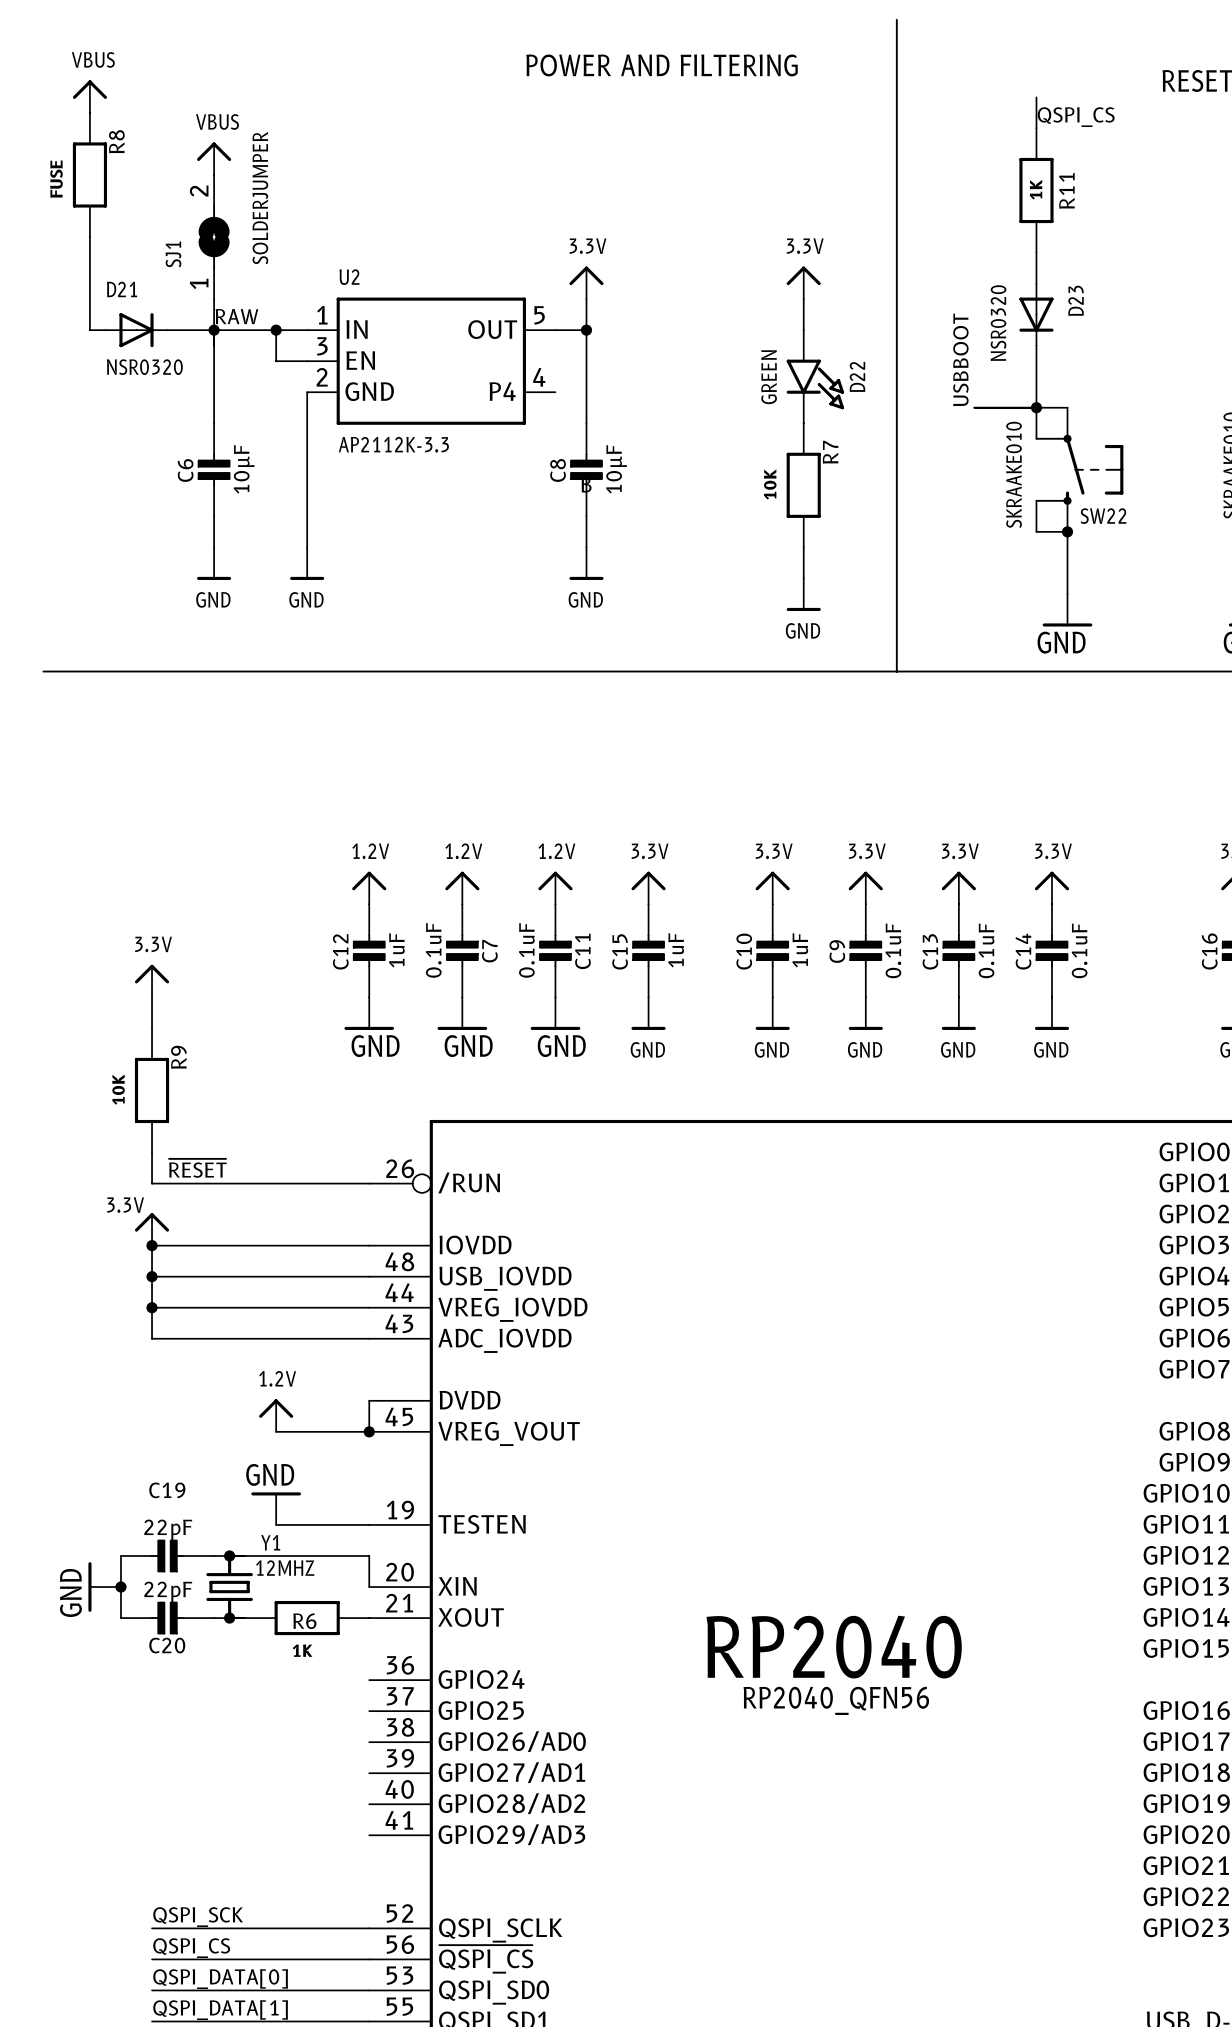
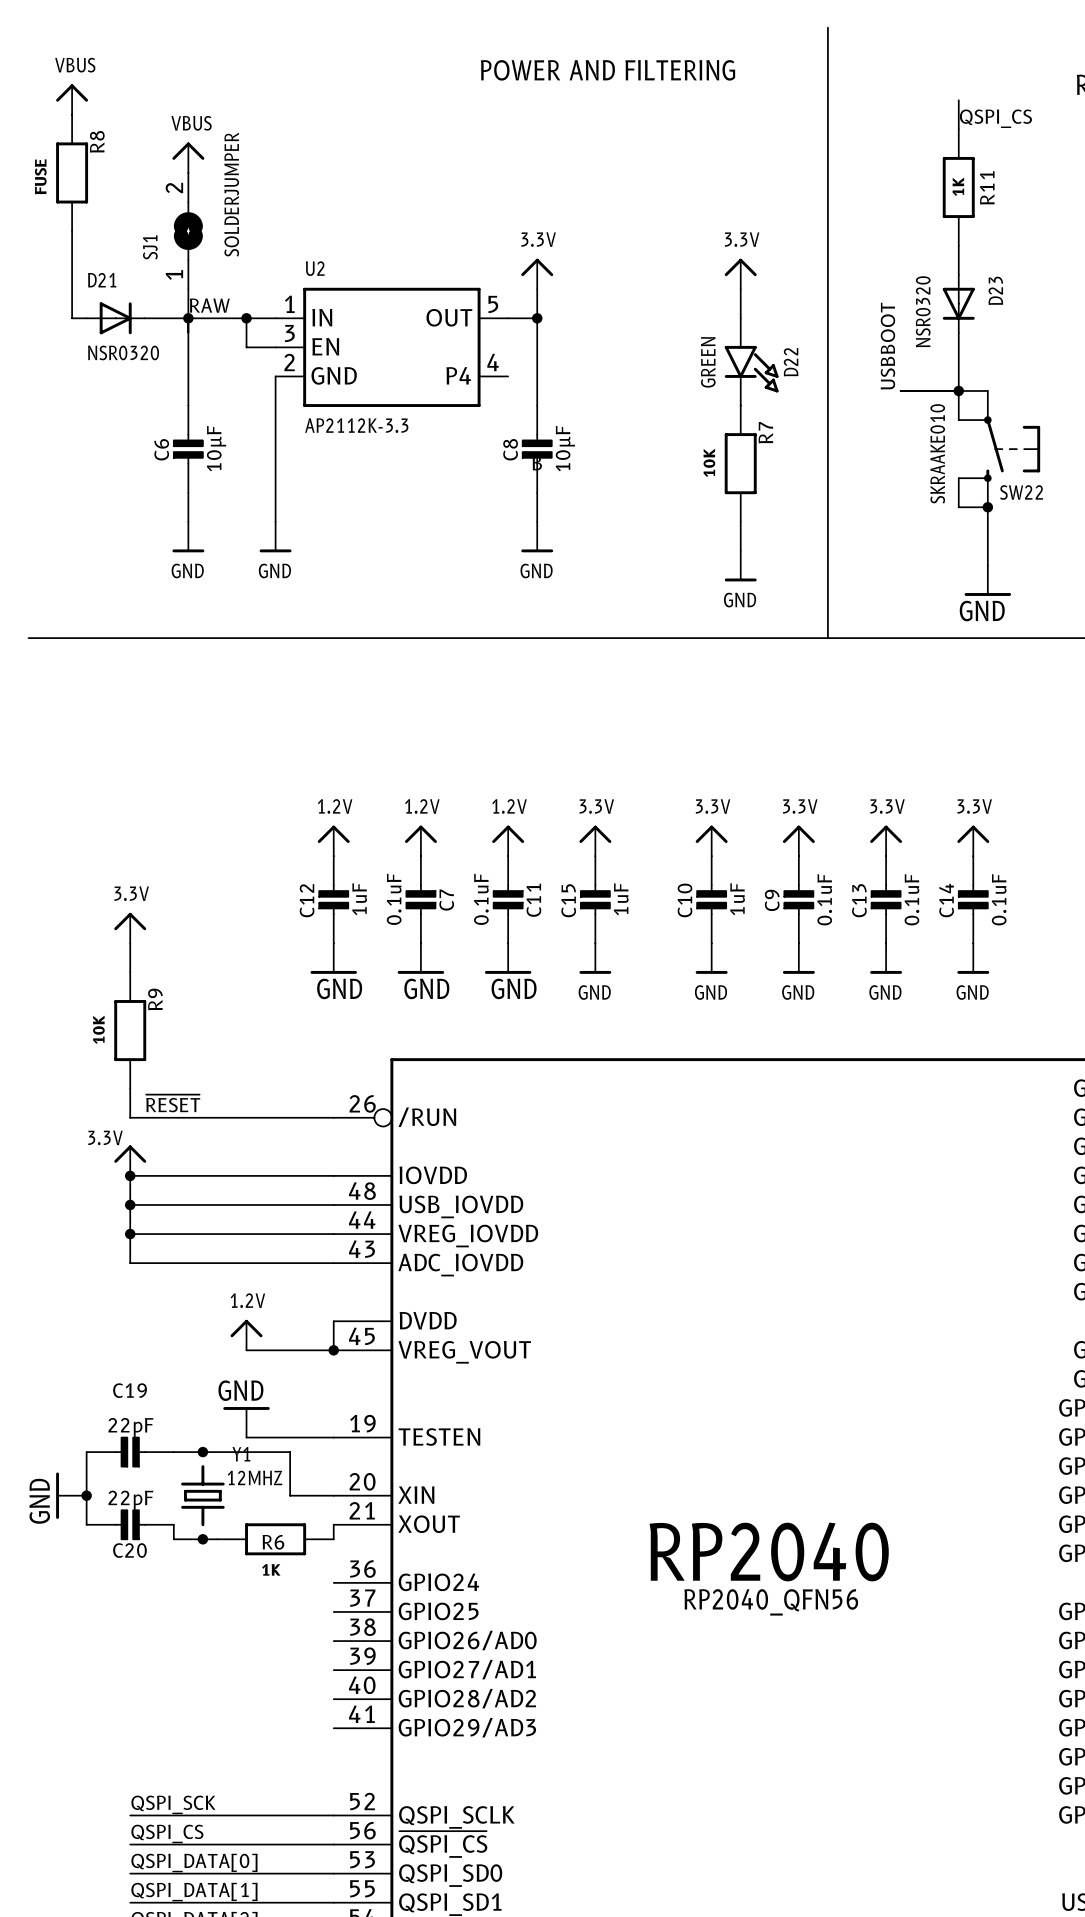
wire: none -> (86, 1452) (86, 1524)
wire: (120, 1555) (120, 1618) -> none
C19 position: (167, 1555) -> (130, 1452)
wire: (214, 1555) (369, 1555) (369, 1587) -> (173, 1452) (290, 1452) (290, 1495) (333, 1495)
junction position: (229, 1555) -> (202, 1452)
power symbol position: GND (104, 1587) -> GND (71, 1495)
junction position: (120, 1587) -> (86, 1495)
C20 position: (167, 1618) -> (130, 1524)
wire: none -> (173, 1524) (173, 1539) (217, 1539)
wire: (214, 1618) (245, 1618) -> none
junction position: (229, 1618) -> (202, 1539)
R6 position: (307, 1618) -> (275, 1539)
wire: none -> (333, 1524) (333, 1539)

